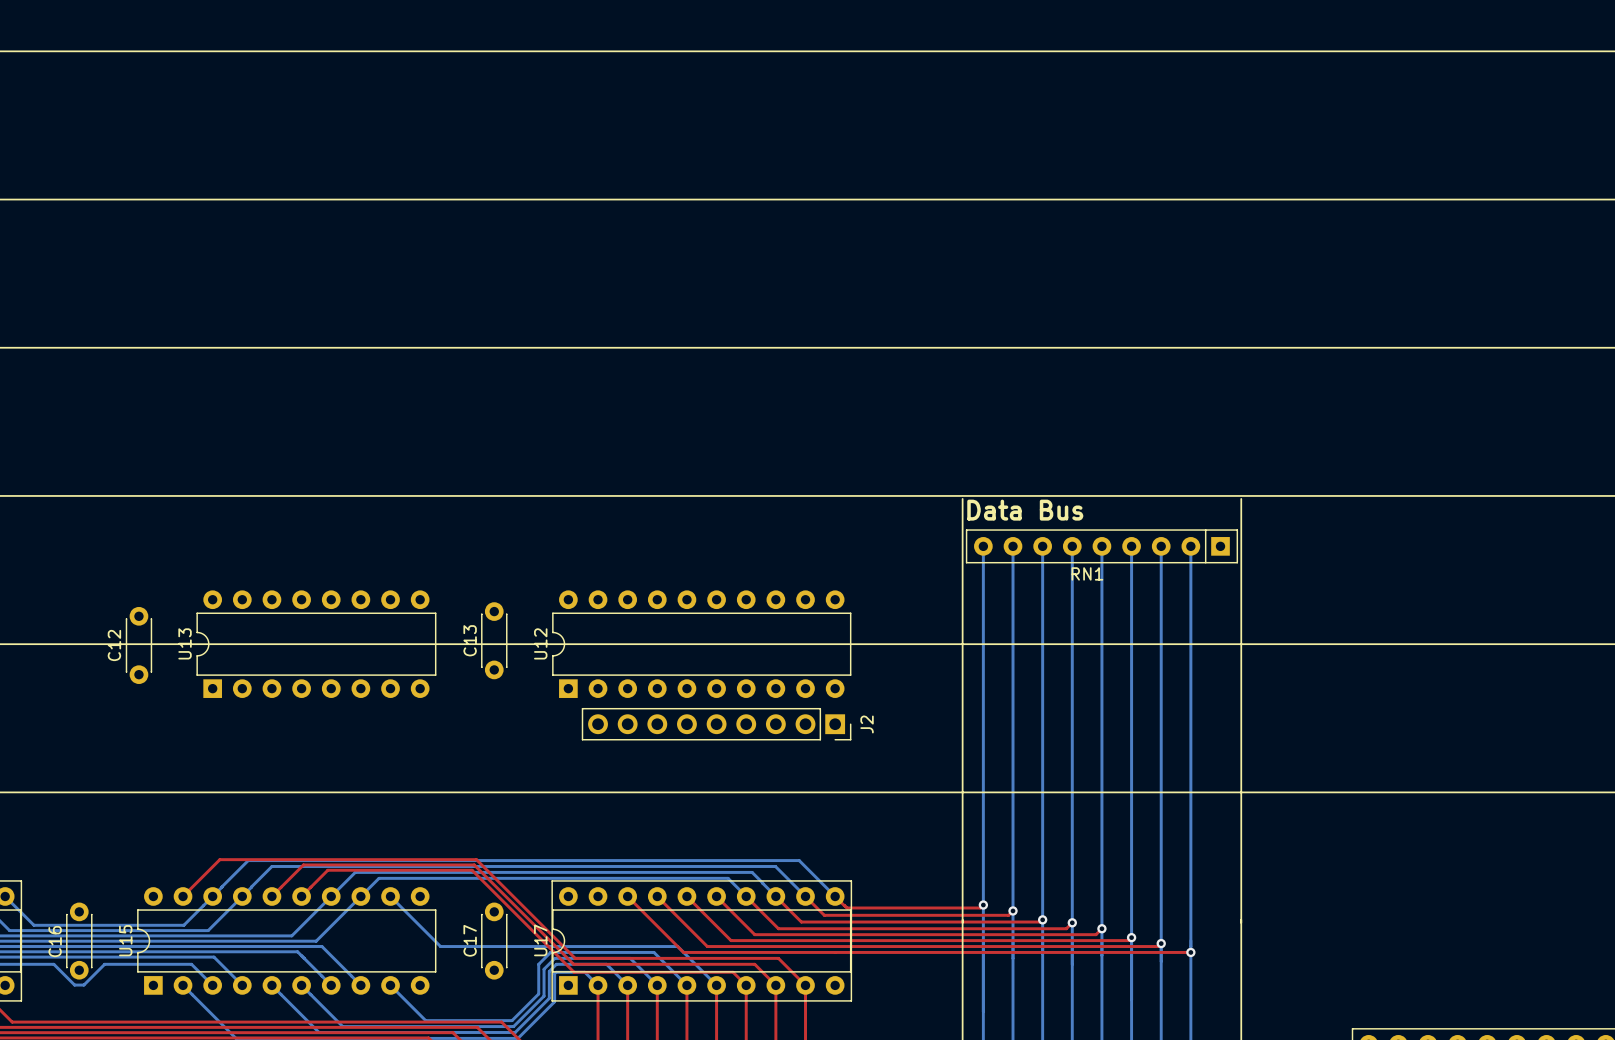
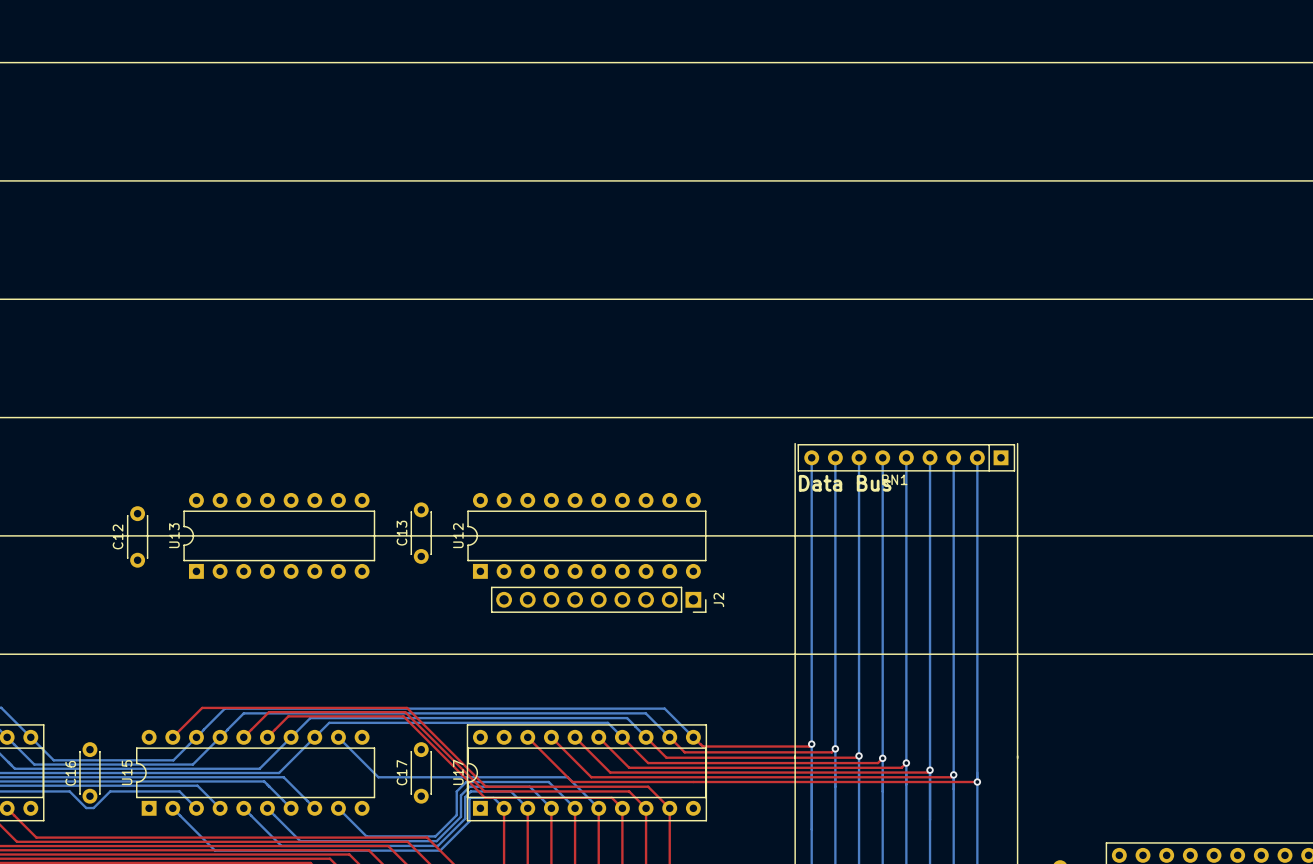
line: (962, 498) (962, 528) -> none
line: (1241, 498) (1241, 528) -> none
text position: Data Bus (1025, 510) -> Data Bus (845, 483)

